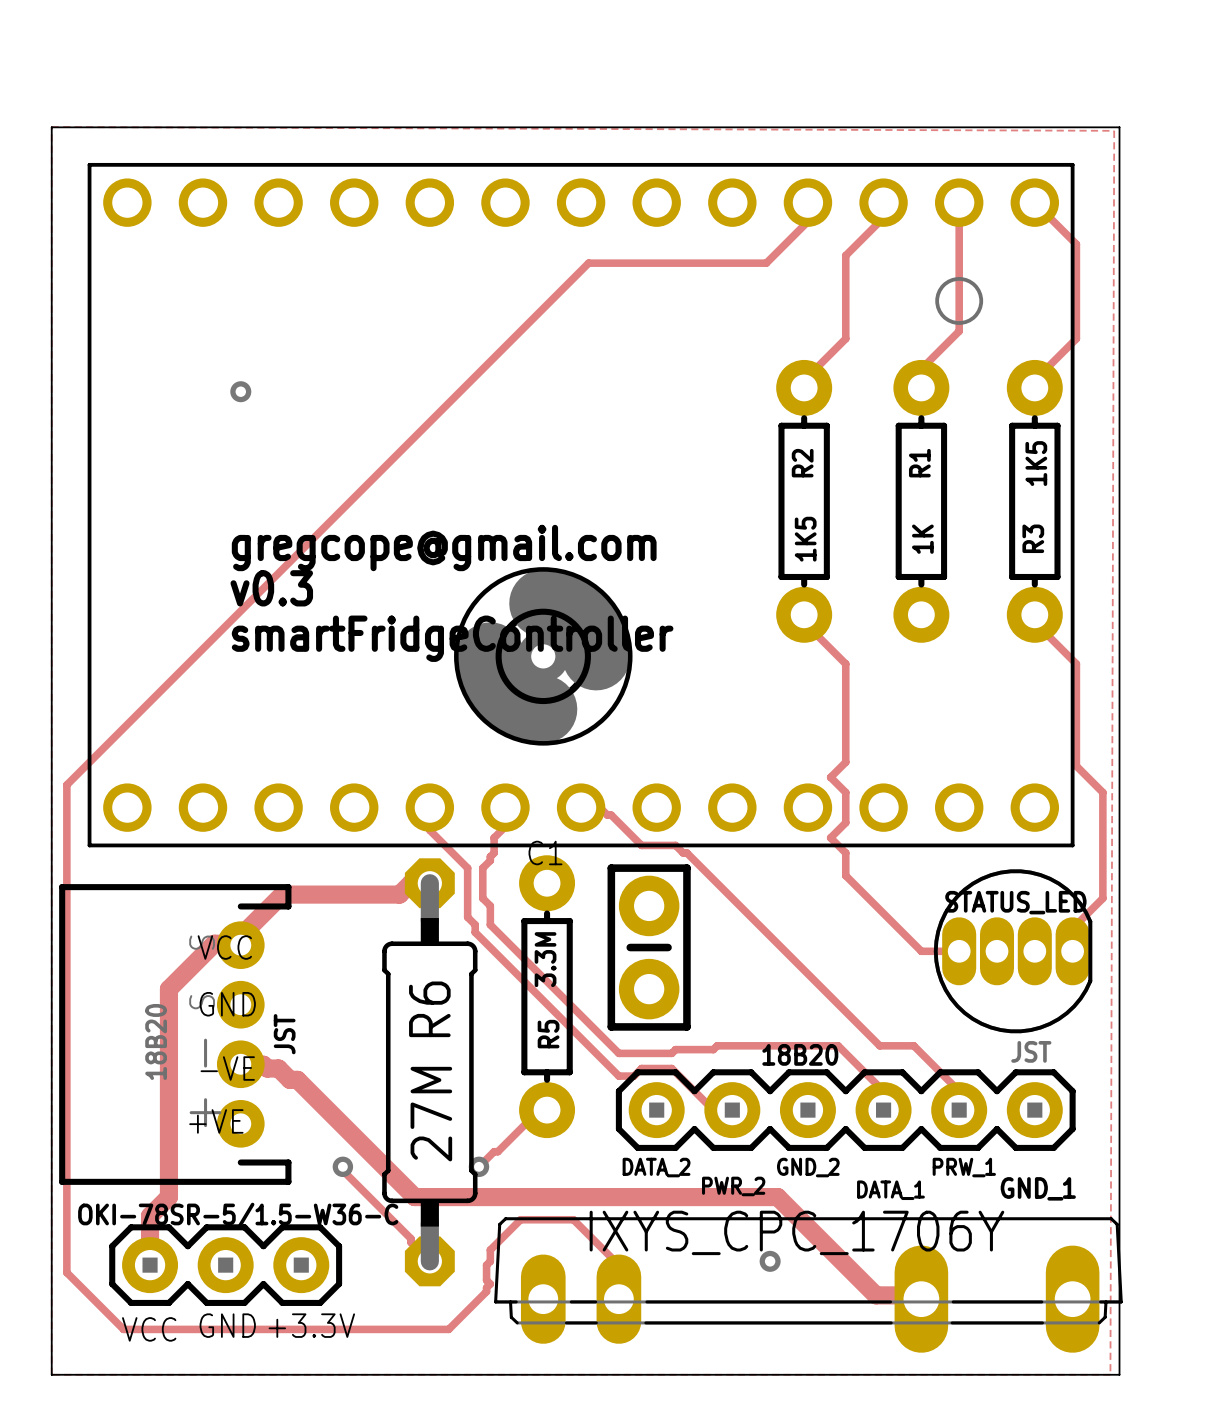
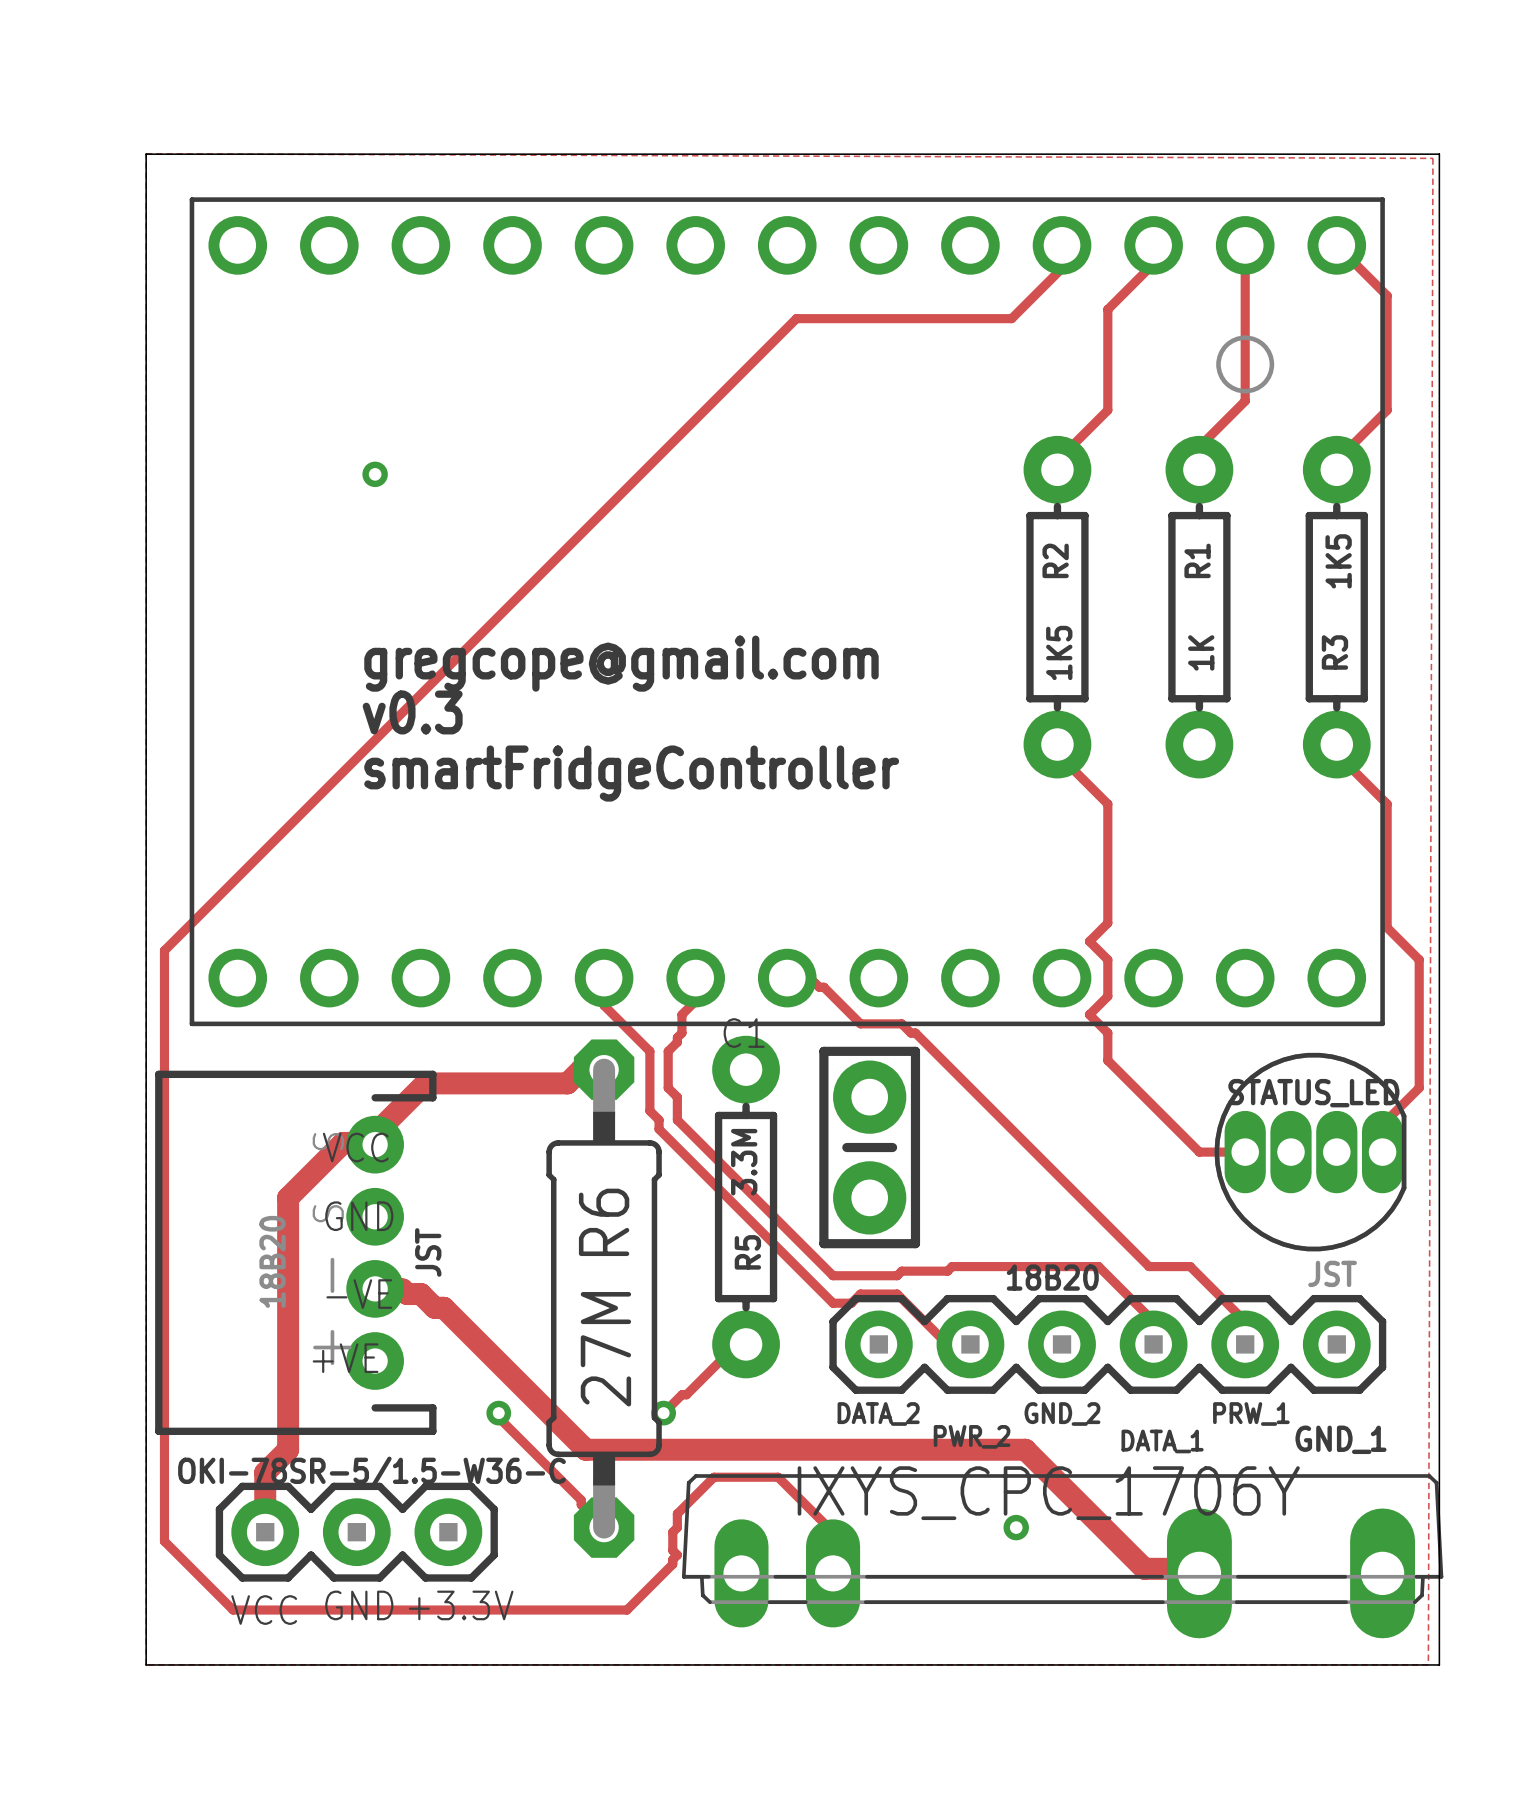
part: (543, 656) -> none

